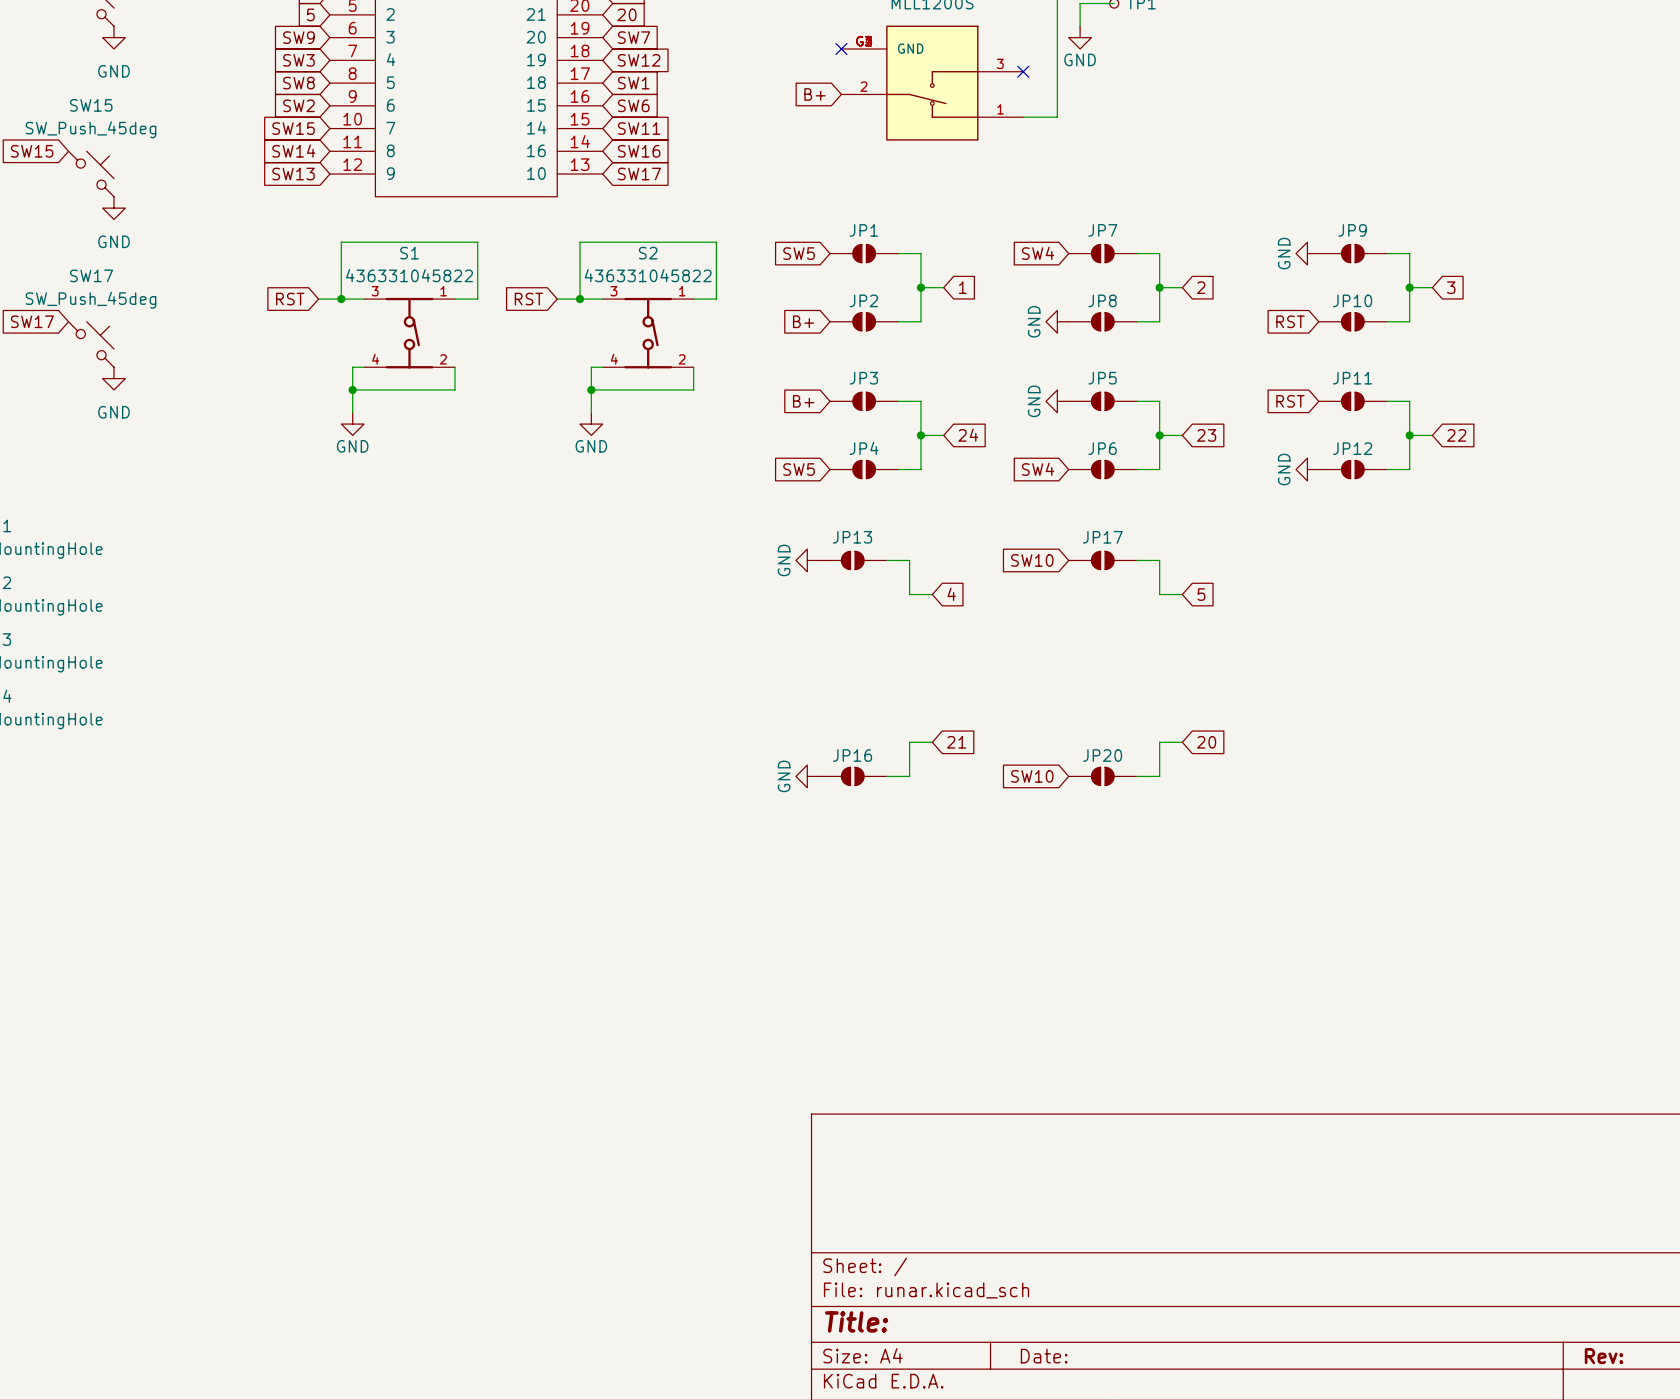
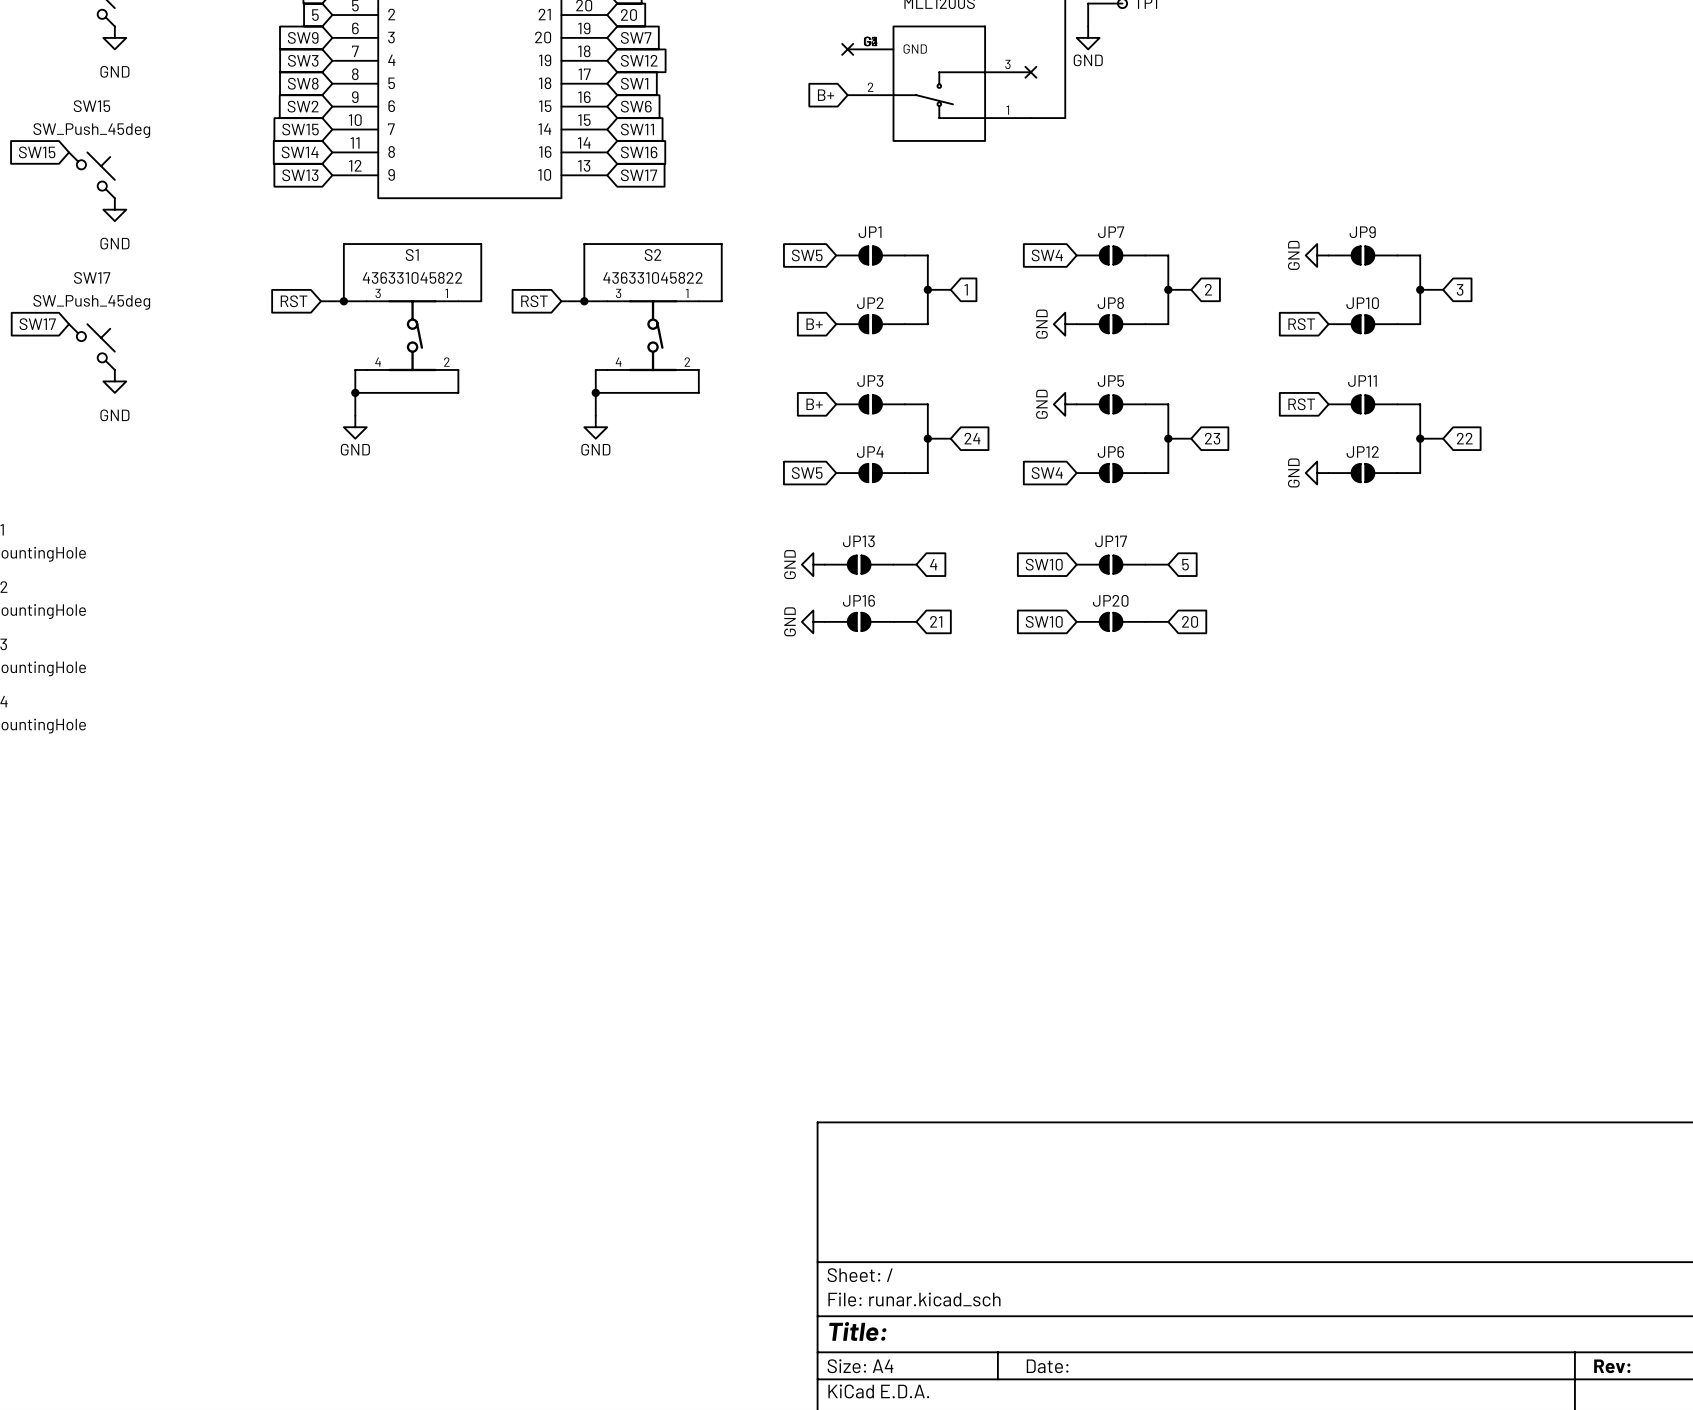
wire: (909, 560) (909, 594) (932, 594) -> none
wire: (1159, 560) (1159, 594) (1182, 594) -> none
global label position: 4 (951, 594) -> 4 (933, 564)
global label position: 5 (1201, 594) -> 5 (1185, 564)
wire: none -> (893, 621) (916, 621)
wire: none -> (1145, 621) (1168, 621)
wire: (932, 742) (909, 742) (909, 776) (886, 776) -> none
global label position: 21 (956, 742) -> 21 (936, 621)
wire: (1182, 742) (1159, 742) (1159, 776) (1136, 776) -> none
global label position: 20 (1206, 742) -> 20 (1190, 621)
power symbol position: GND (807, 776) -> GND (813, 621)
JP16 position: (852, 776) -> (859, 621)
global label position: SW10 (1032, 776) -> SW10 (1044, 621)
JP20 position: (1102, 776) -> (1111, 621)

